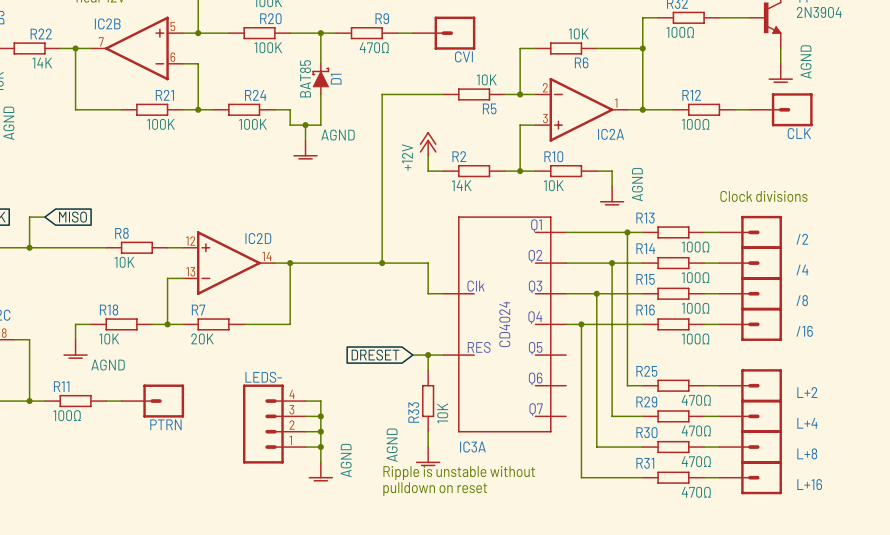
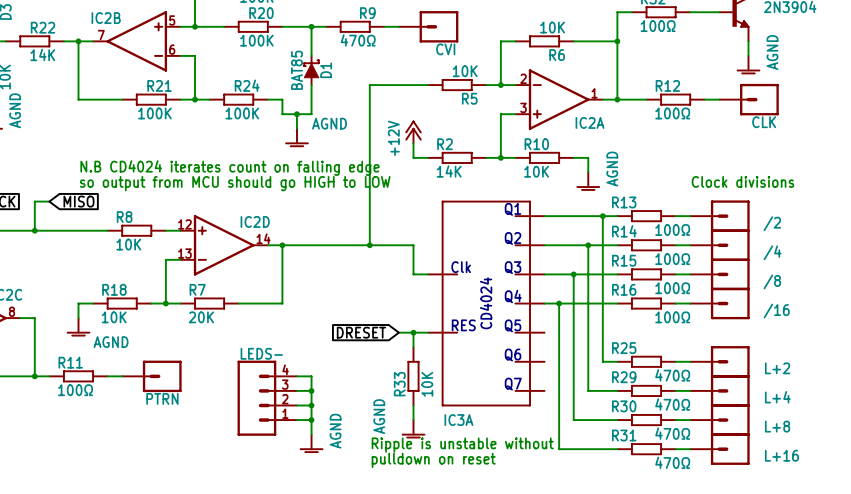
text: none -> N.B CD4024 iterates count on falling edge (230, 168)
text: none -> so output from MCU should go HIGH to LOW (235, 183)

